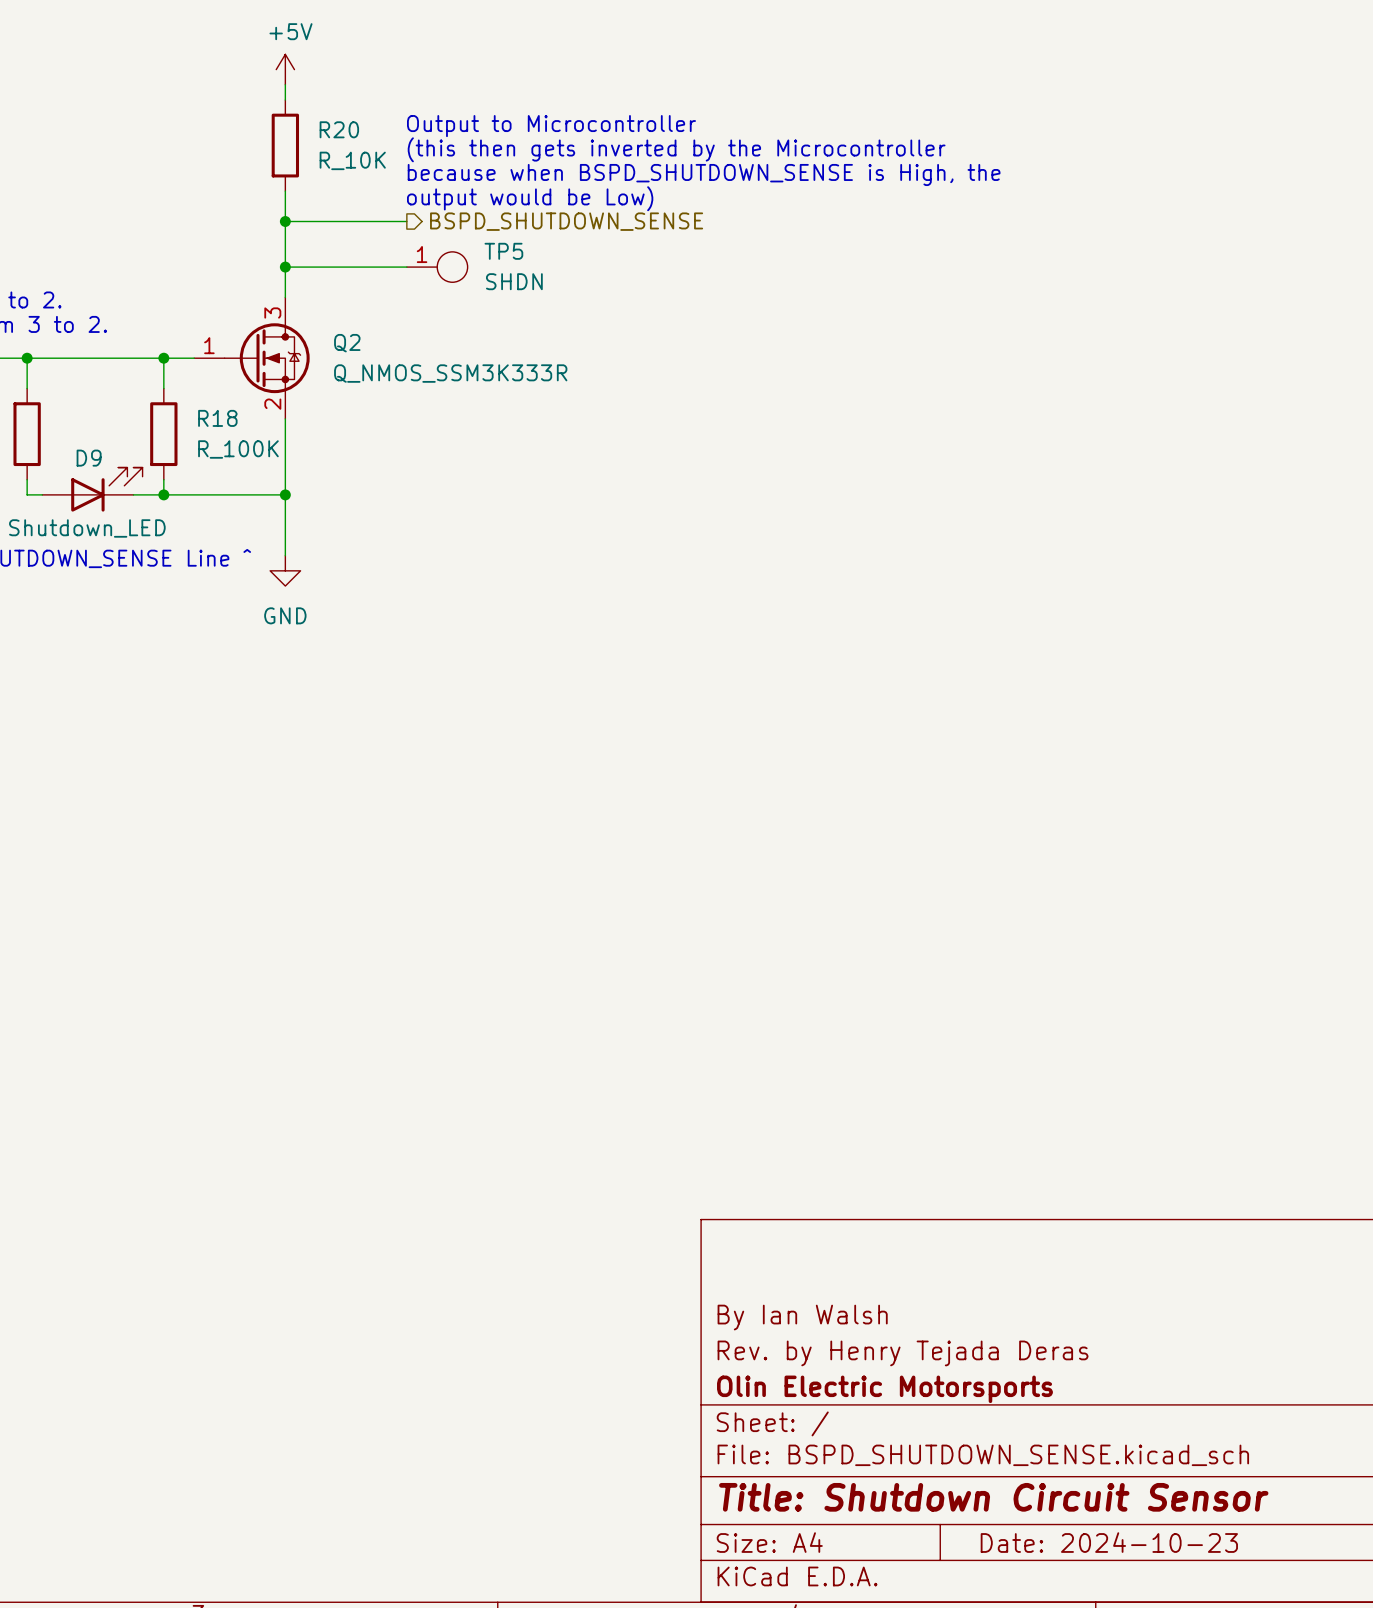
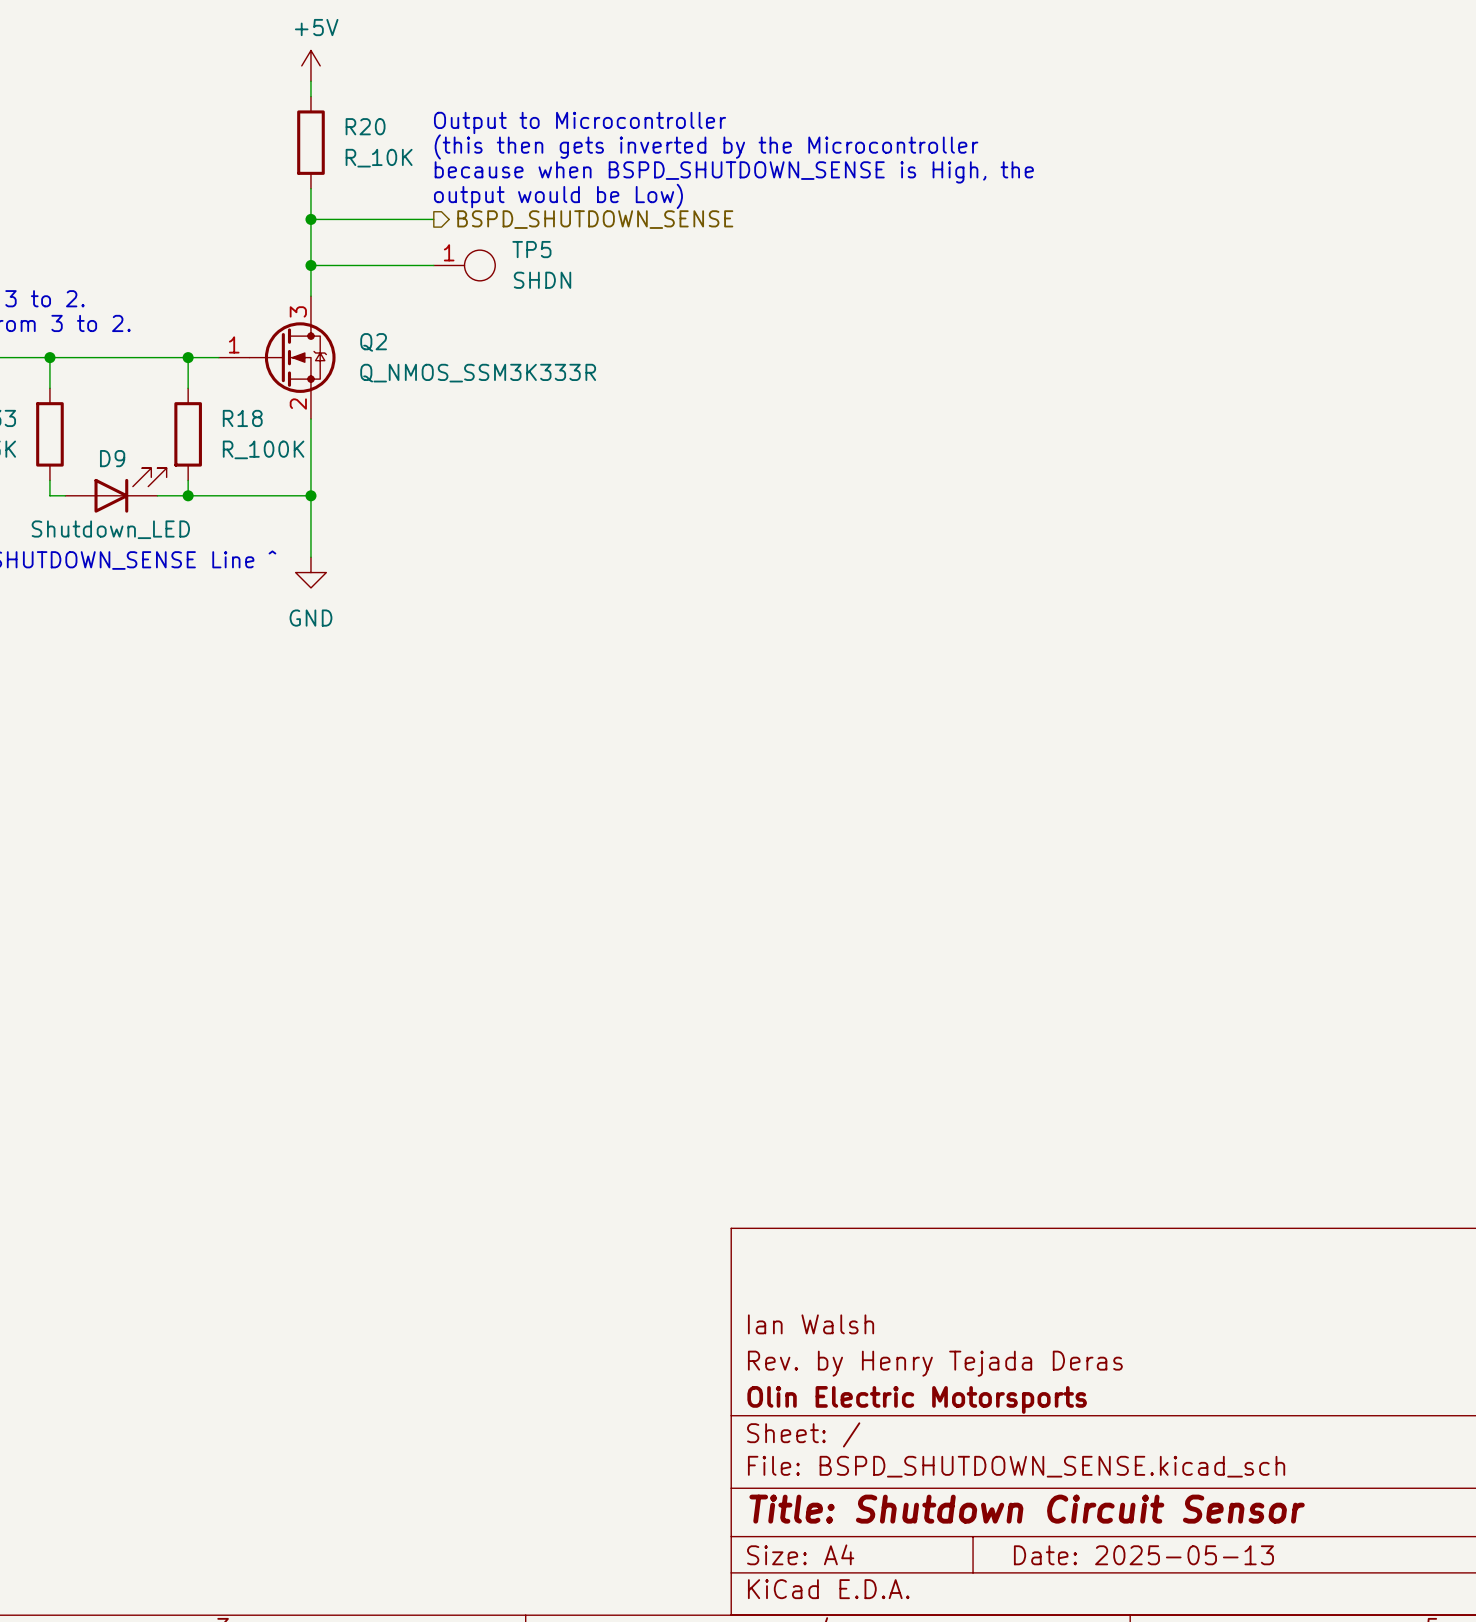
title block: By Ian Walsh (802, 1317) -> Ian Walsh (811, 1324)
title block: Date: 2024-10-23 (1109, 1542) -> Date: 2025-05-13 (1143, 1555)

